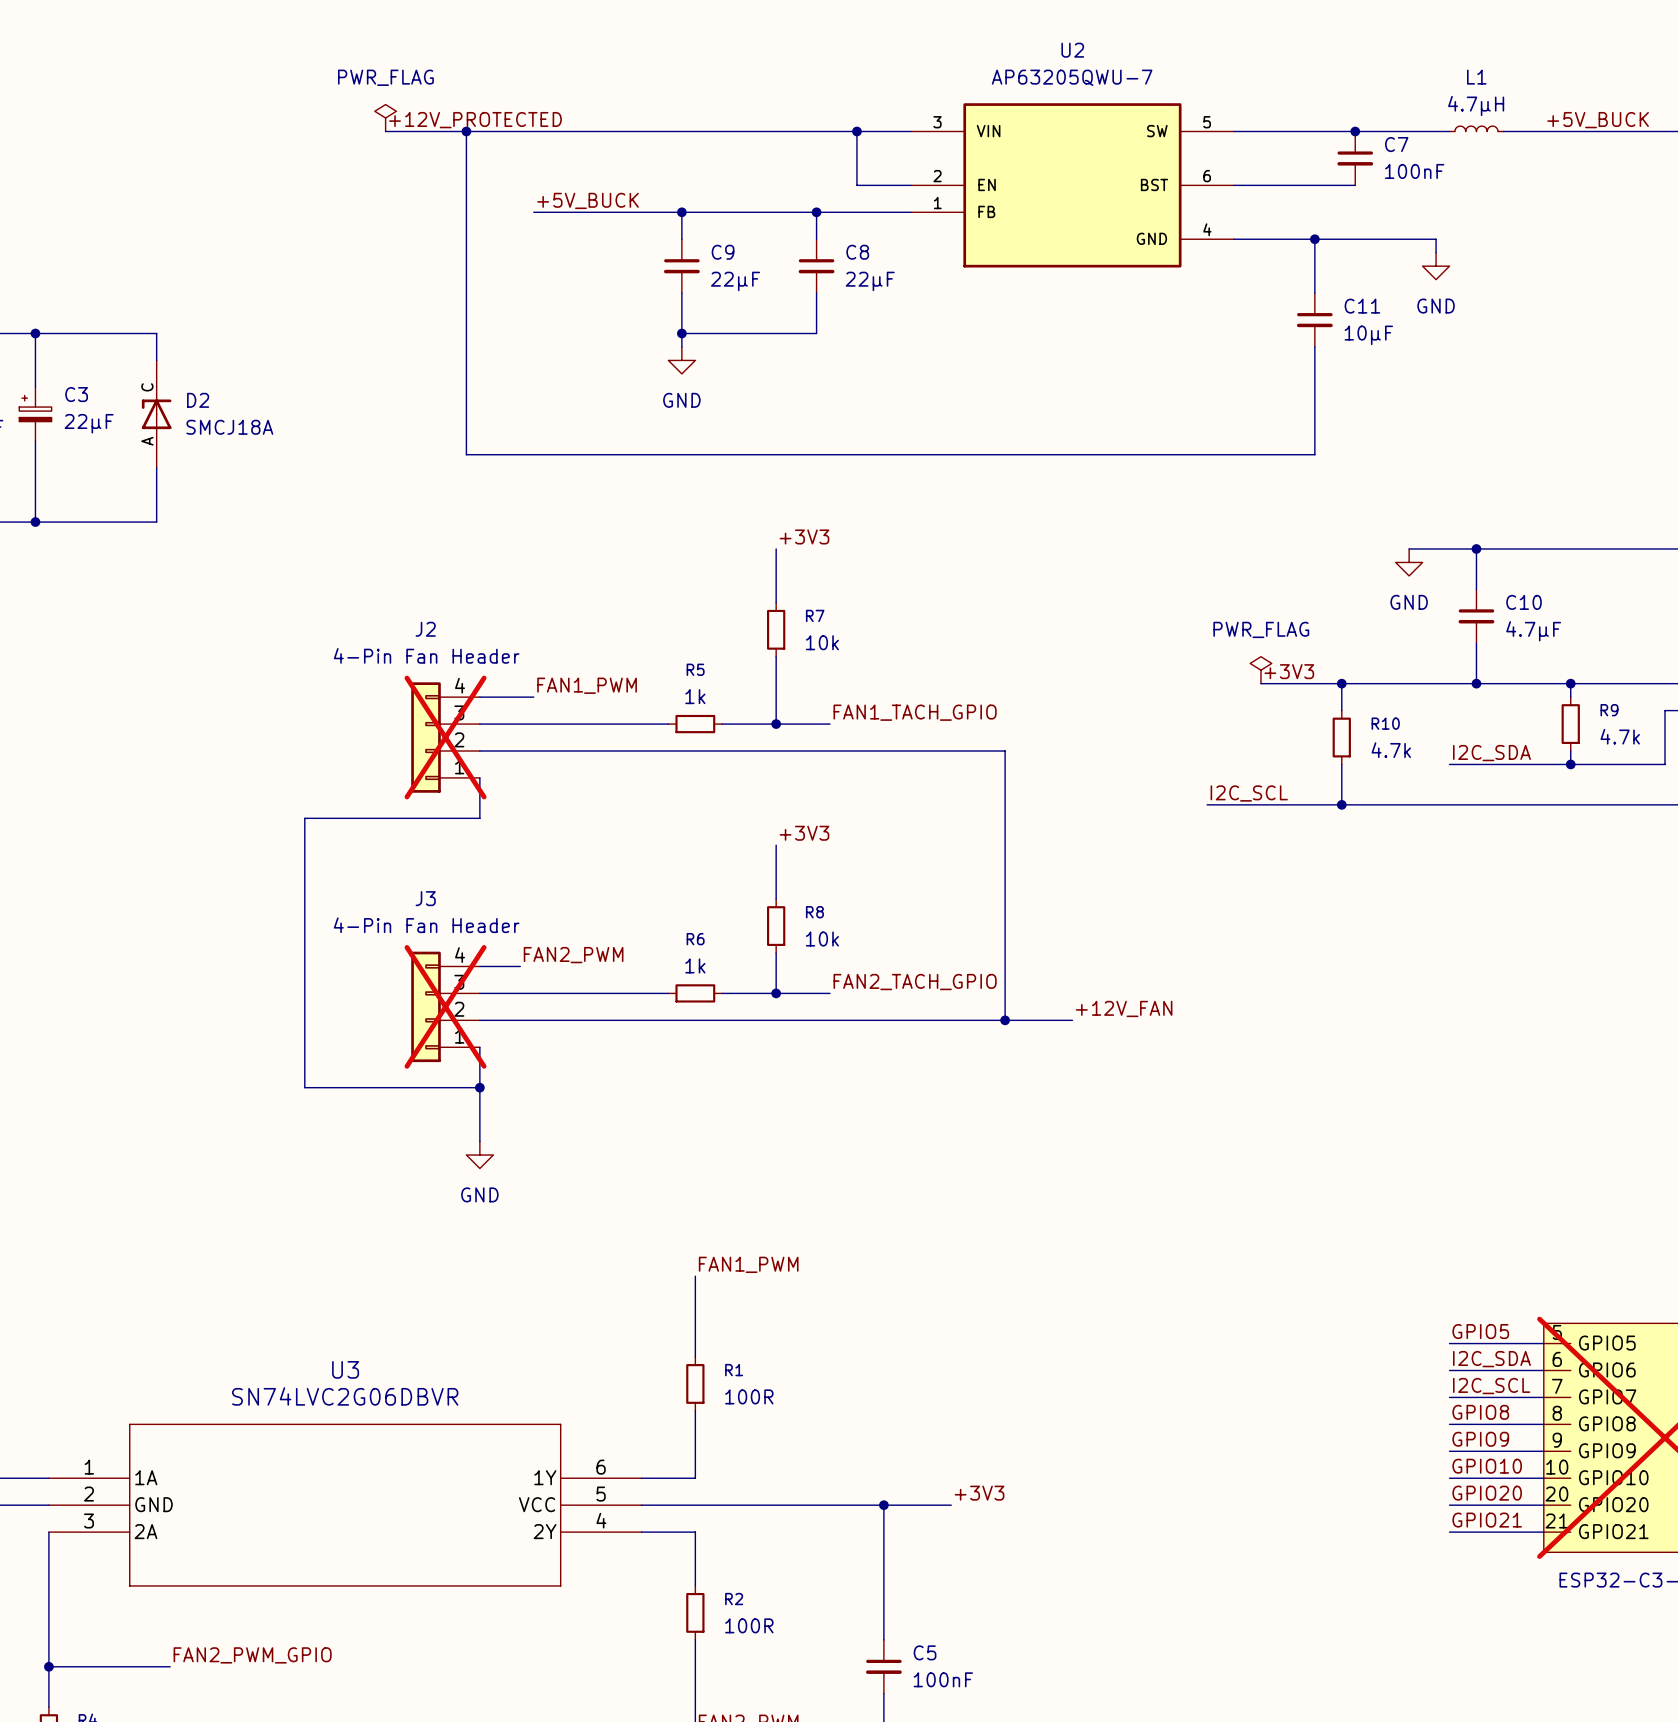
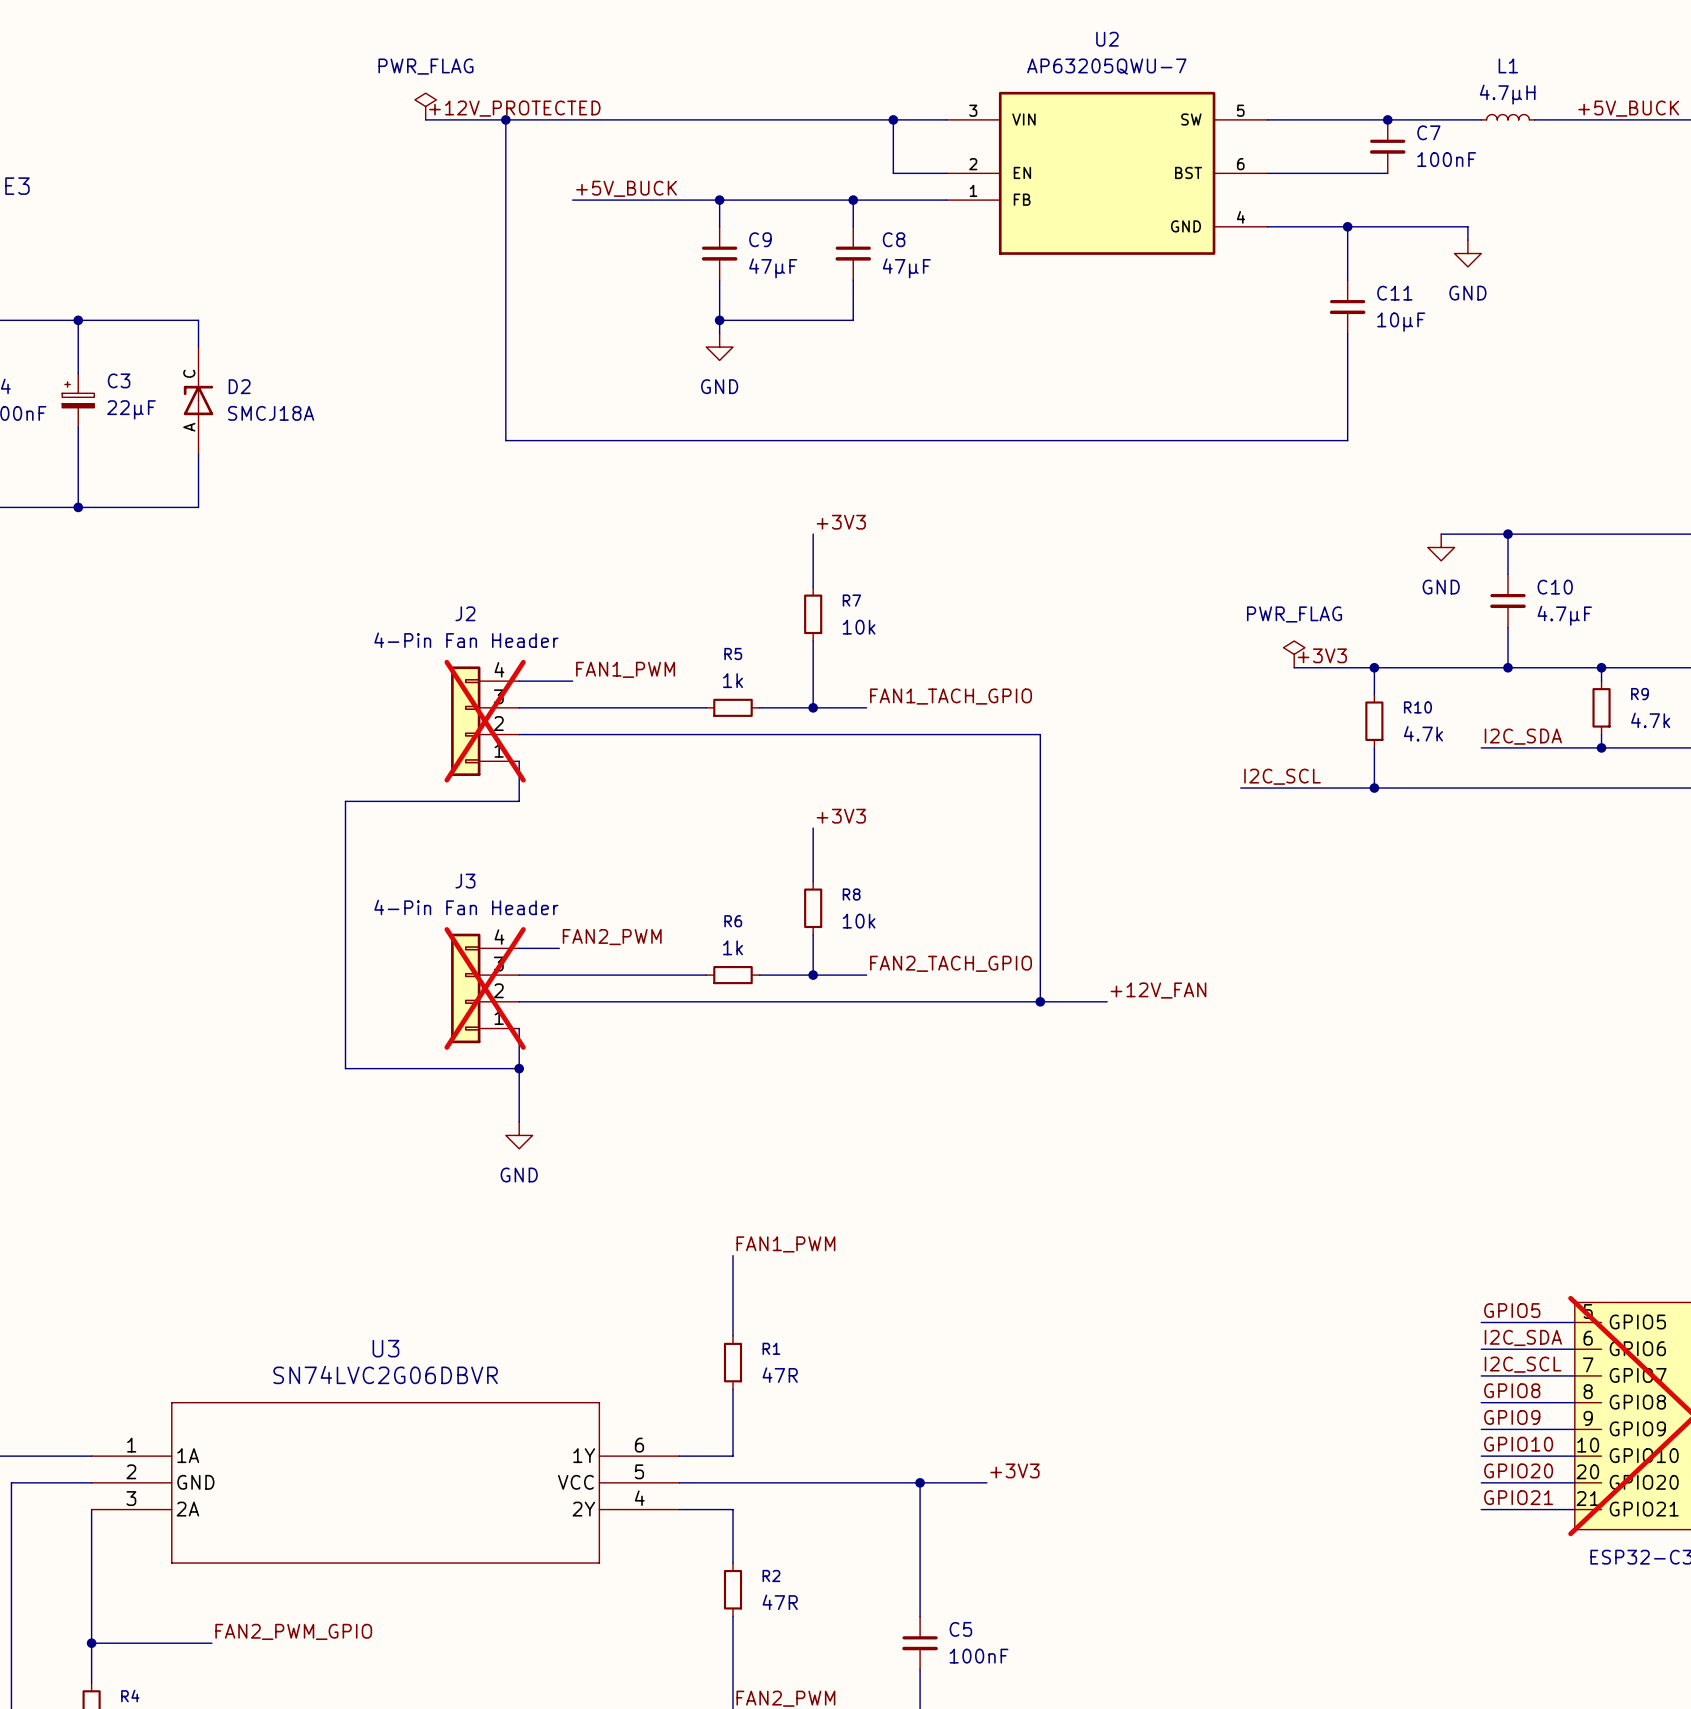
C9 value: 22µF (735, 281) -> 47µF (773, 268)
C8 value: 22µF (870, 281) -> 47µF (906, 268)
R1 value: 100R (749, 1396) -> 47R (780, 1375)
R2 value: 100R (749, 1625) -> 47R (780, 1602)

